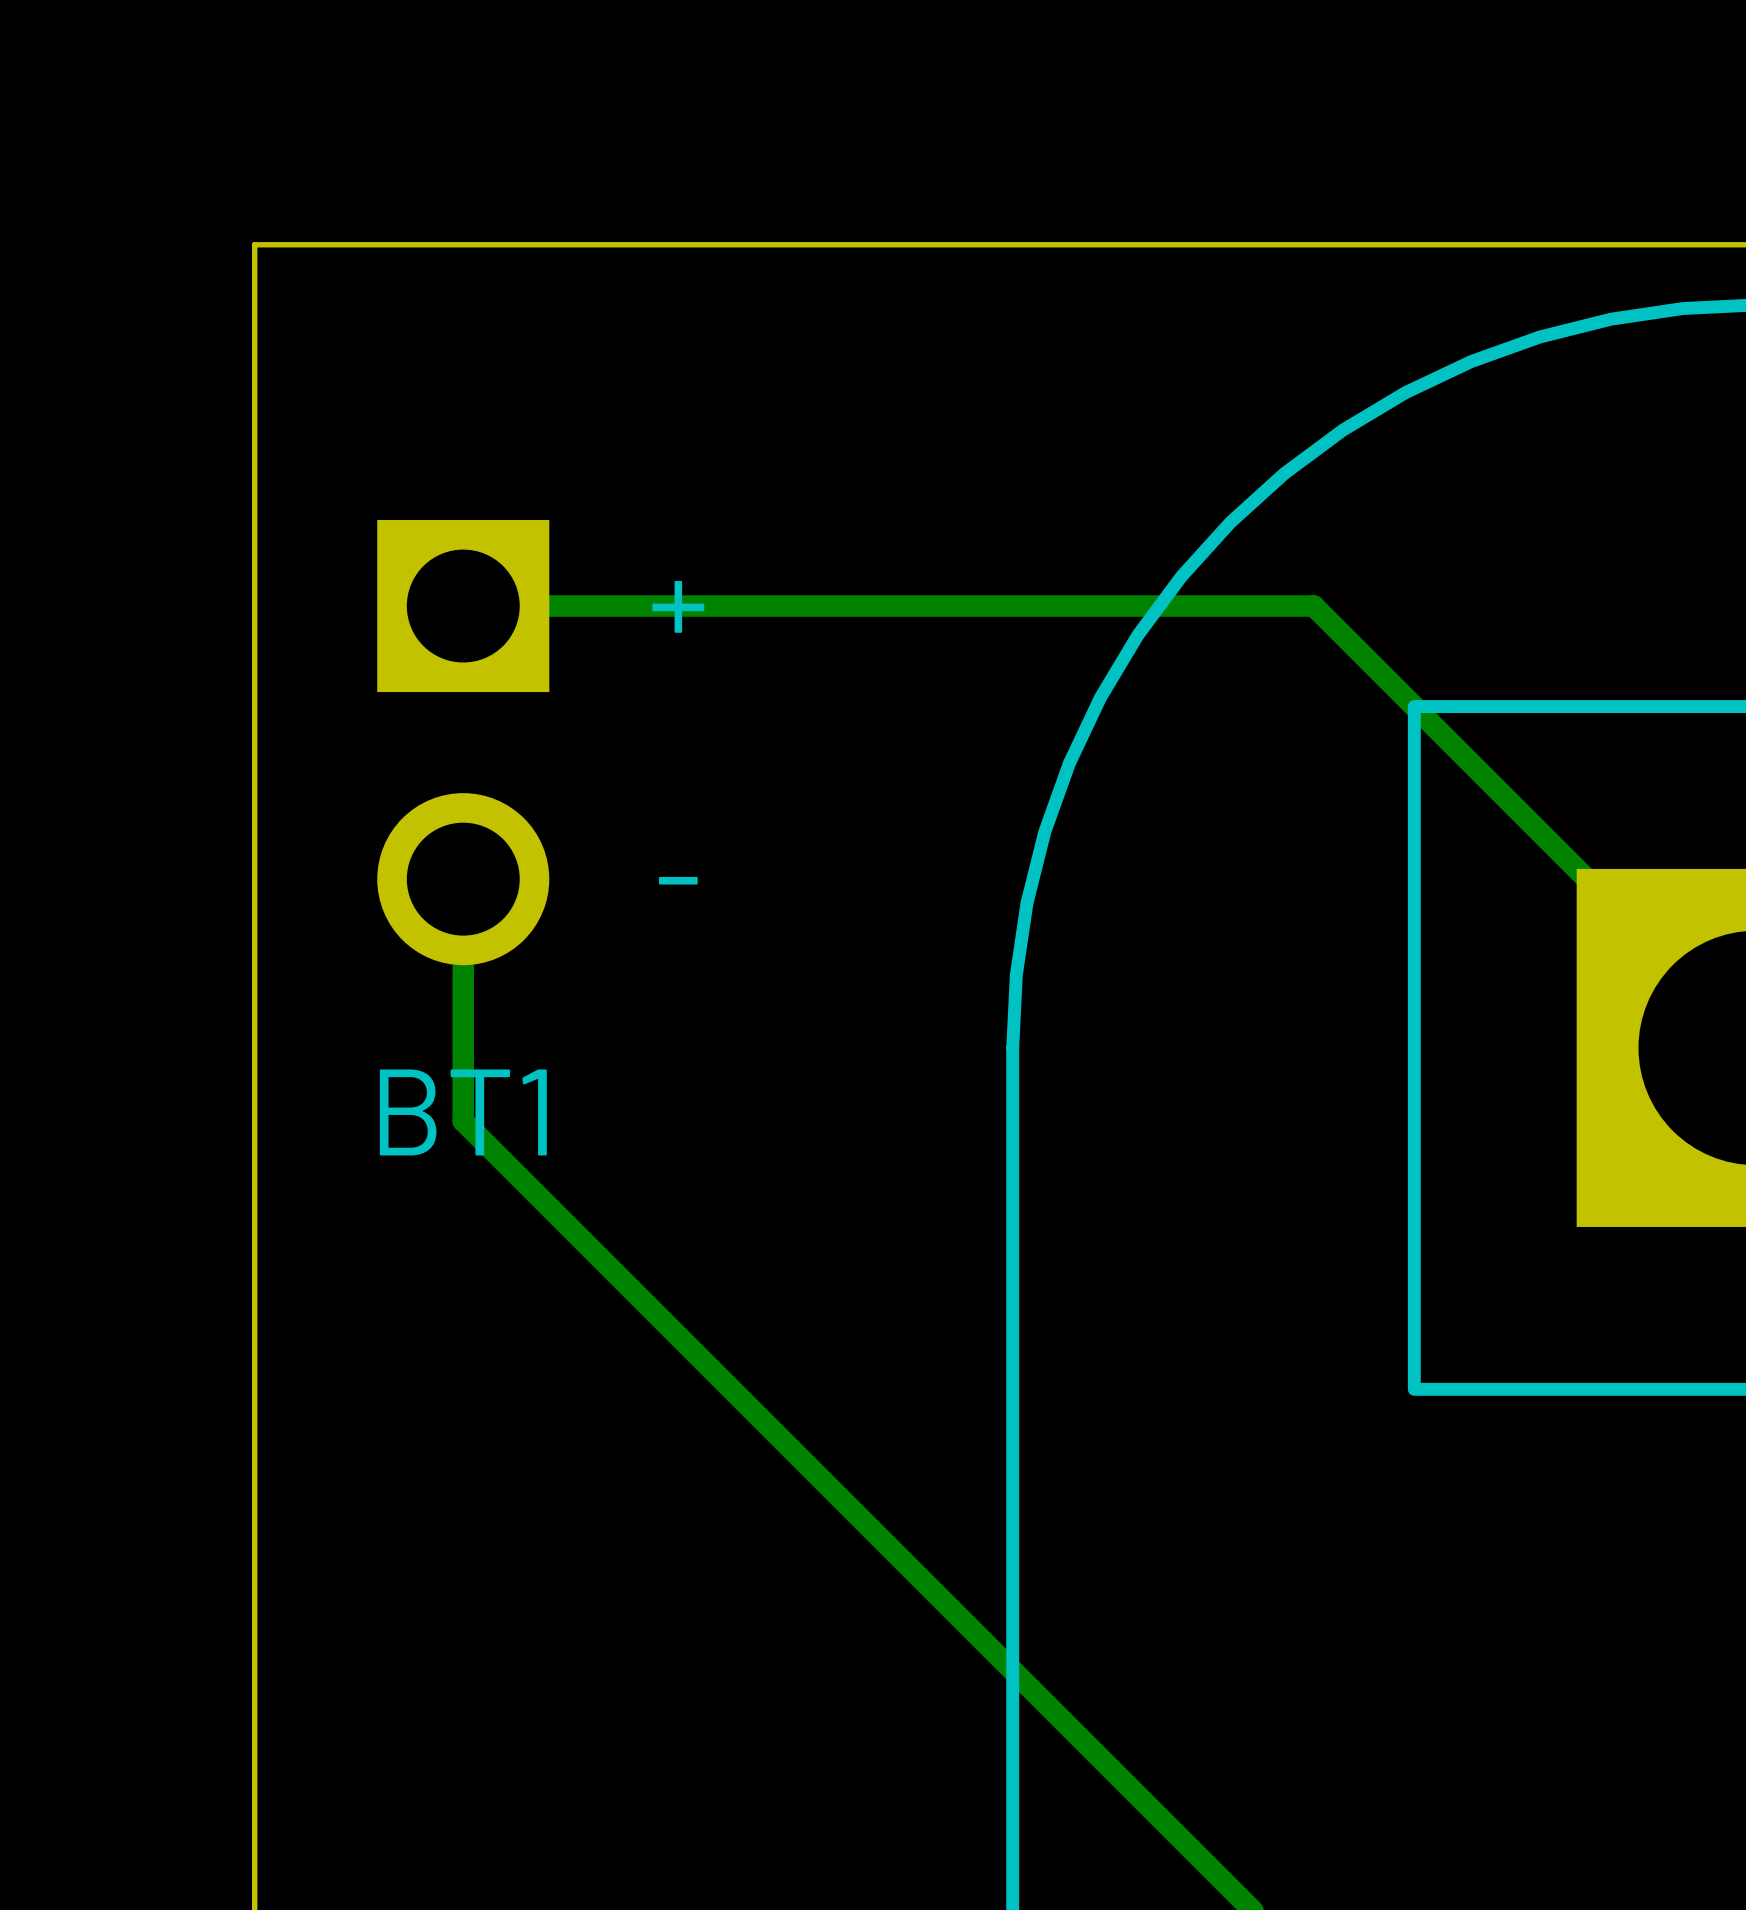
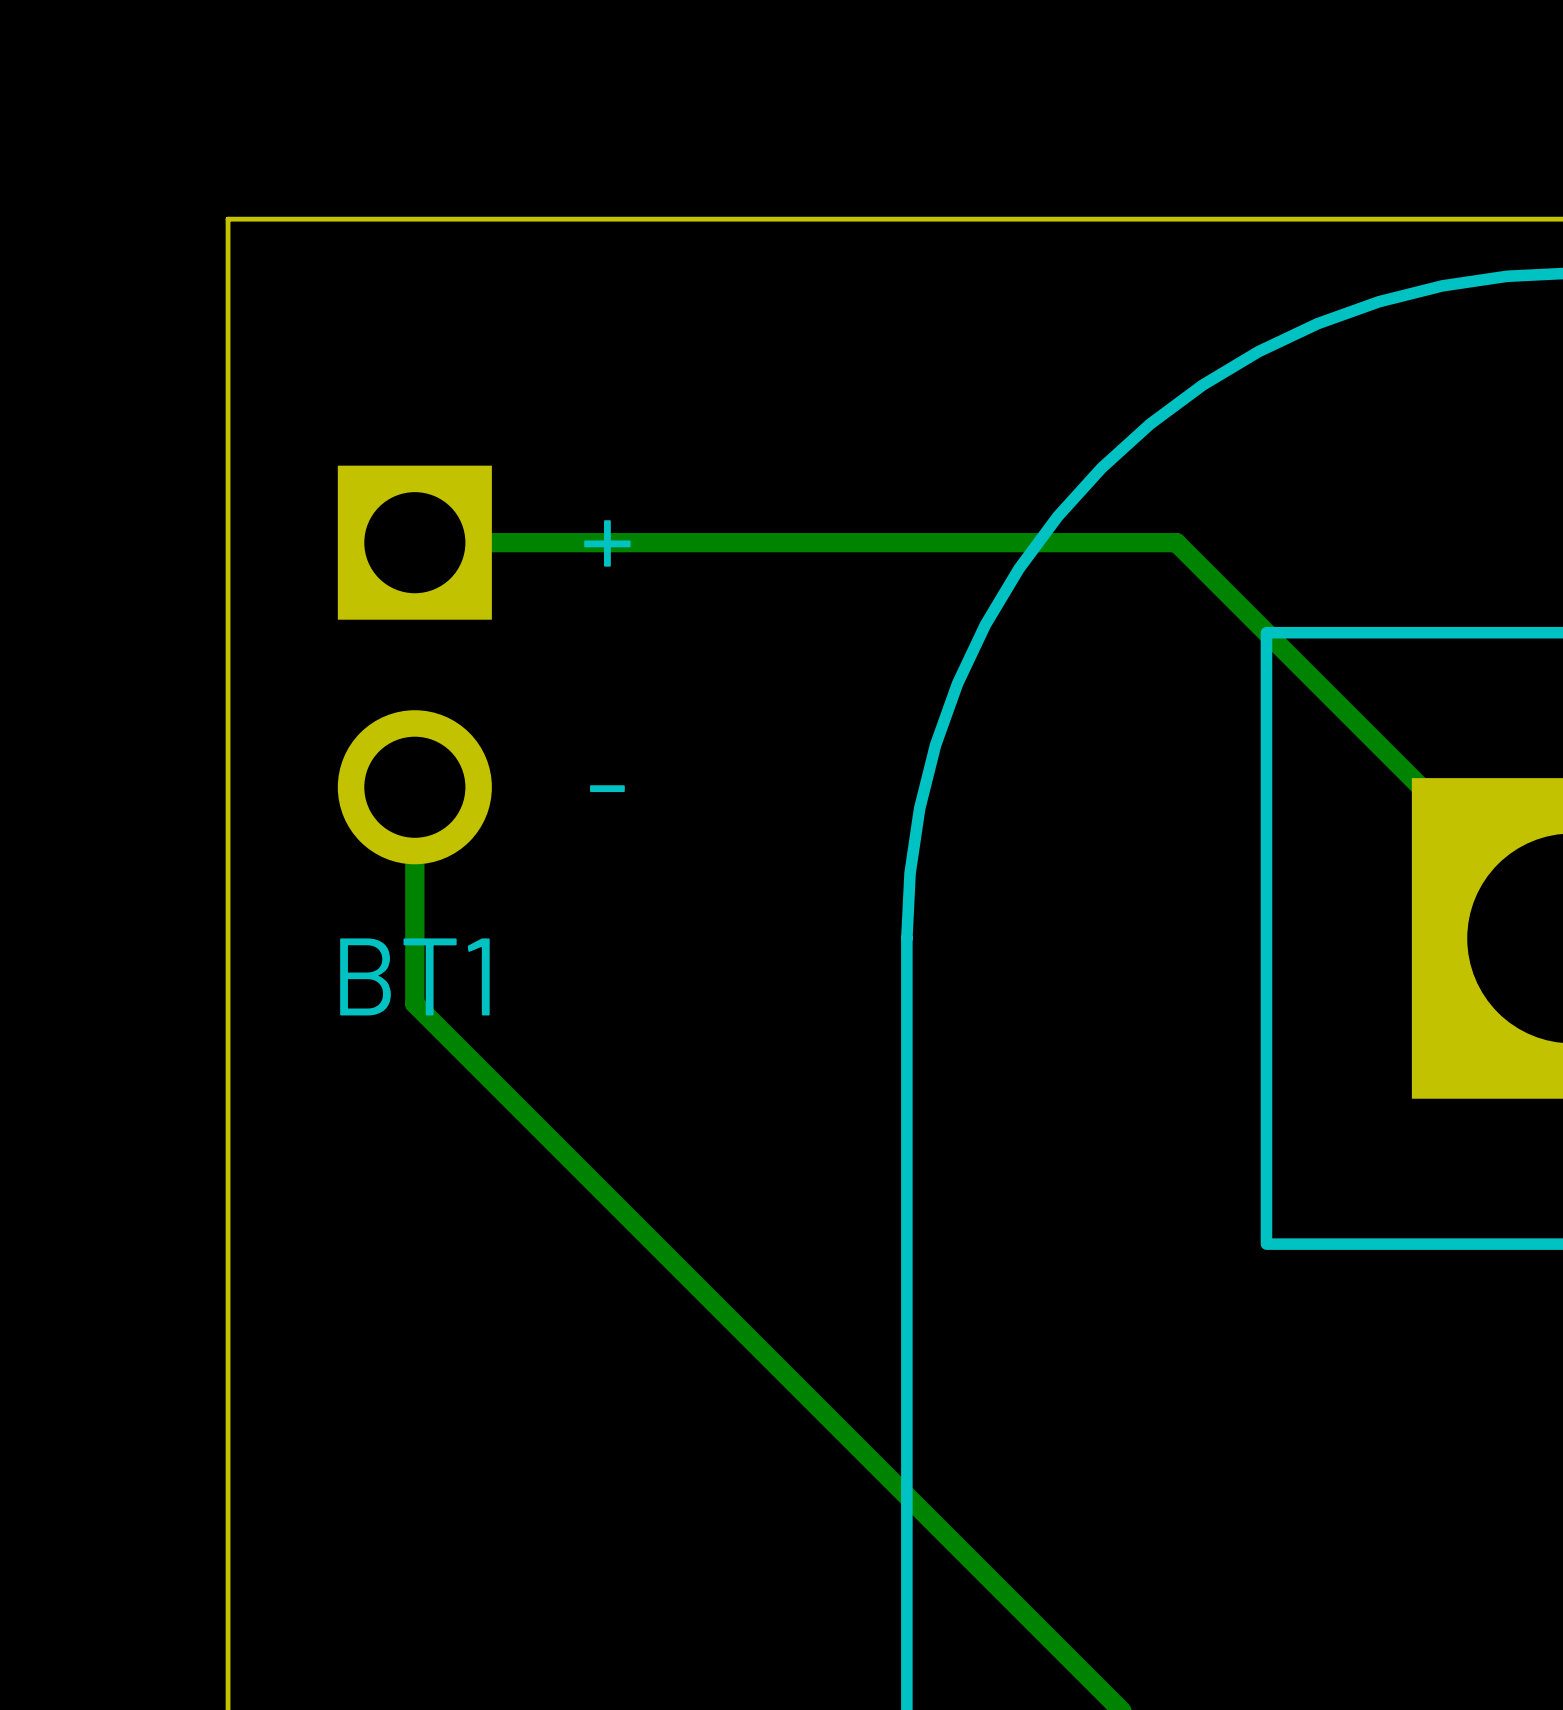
text position: BT1 (463, 1112) -> BT1 (414, 976)

